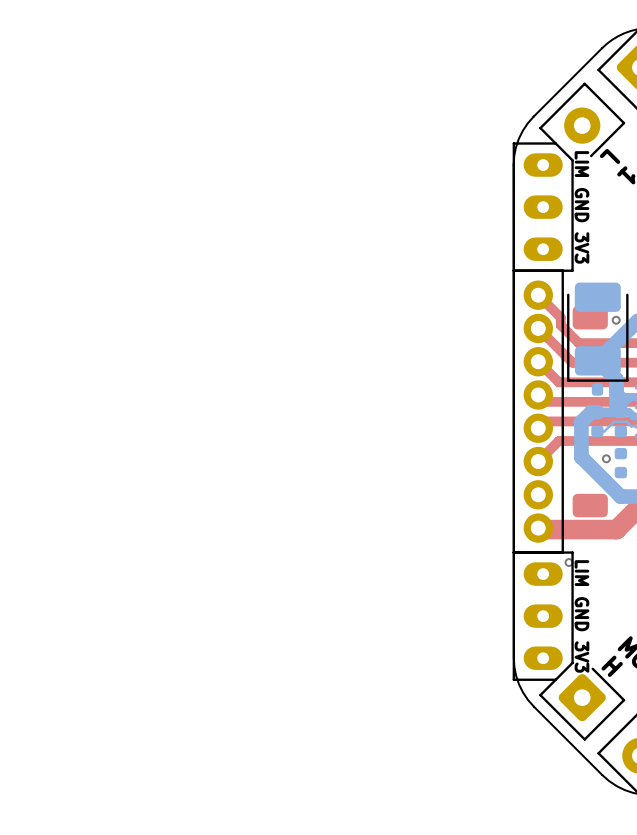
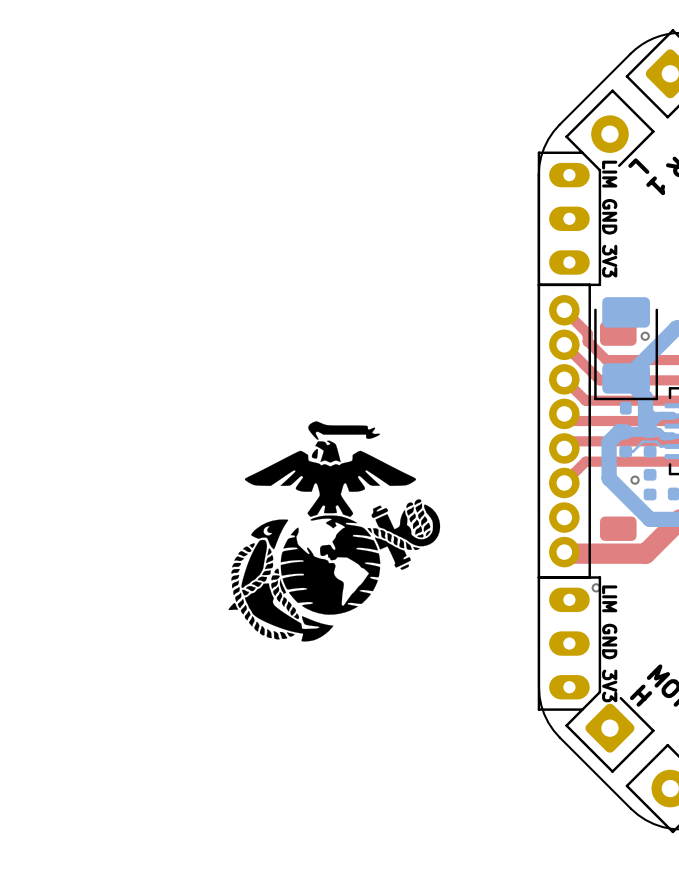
drawing: none -> [228, 421, 441, 642]

